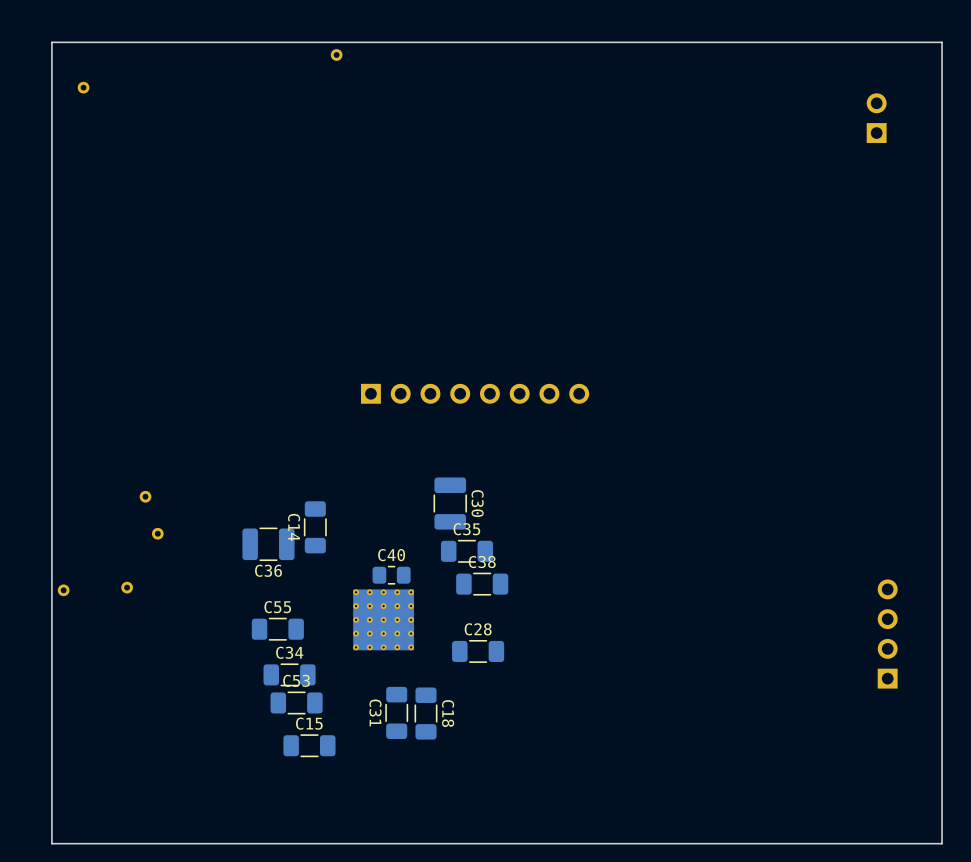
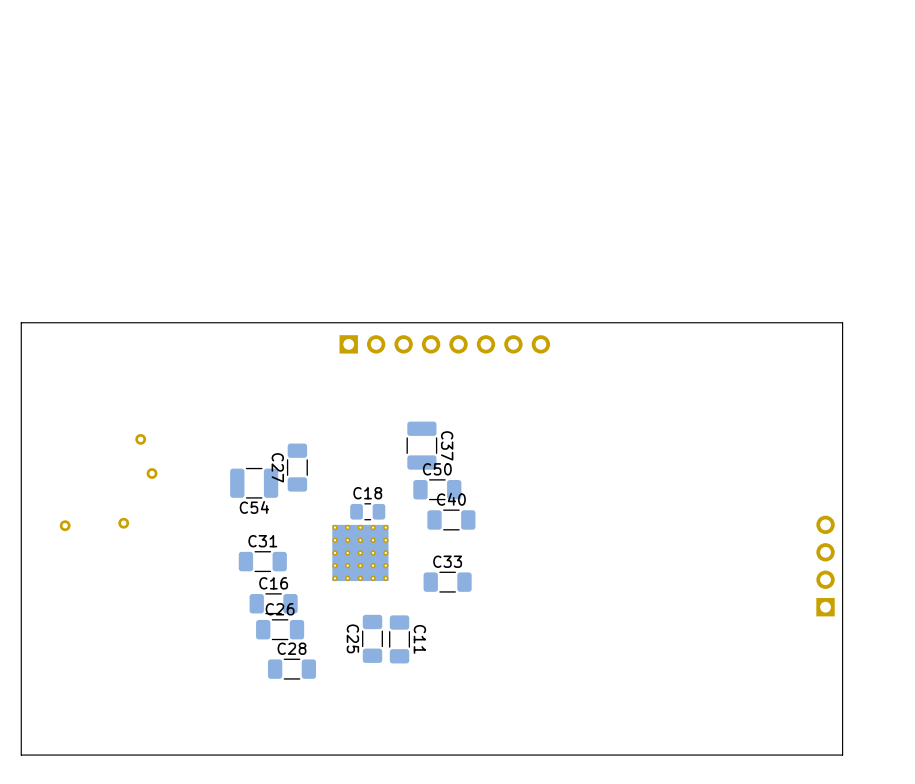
board edge: (942, 42) (51, 42) (51, 843) (942, 843) (942, 42) -> (842, 322) (842, 755) (21, 755) (21, 322) (842, 322)
part: (336, 54) -> none
part: (83, 87) -> none
part: (876, 118) -> none
C30 name: C30 (477, 503) -> C37 (447, 445)
C14 name: C14 (294, 527) -> C27 (277, 467)
C35 name: C35 (466, 529) -> C50 (437, 469)
C40 name: C40 (391, 555) -> C18 (367, 493)
C38 name: C38 (482, 562) -> C40 (451, 499)
C36 name: C36 (268, 570) -> C54 (254, 507)
C55 name: C55 (277, 607) -> C31 (262, 541)
C28 name: C28 (478, 629) -> C33 (447, 561)
C34 name: C34 (289, 652) -> C16 (273, 583)
C53 name: C53 (296, 680) -> C26 (280, 609)
C31 name: C31 (375, 712) -> C25 (352, 638)
C18 name: C18 (448, 713) -> C11 (419, 639)
C15 name: C15 (309, 723) -> C28 (291, 648)

